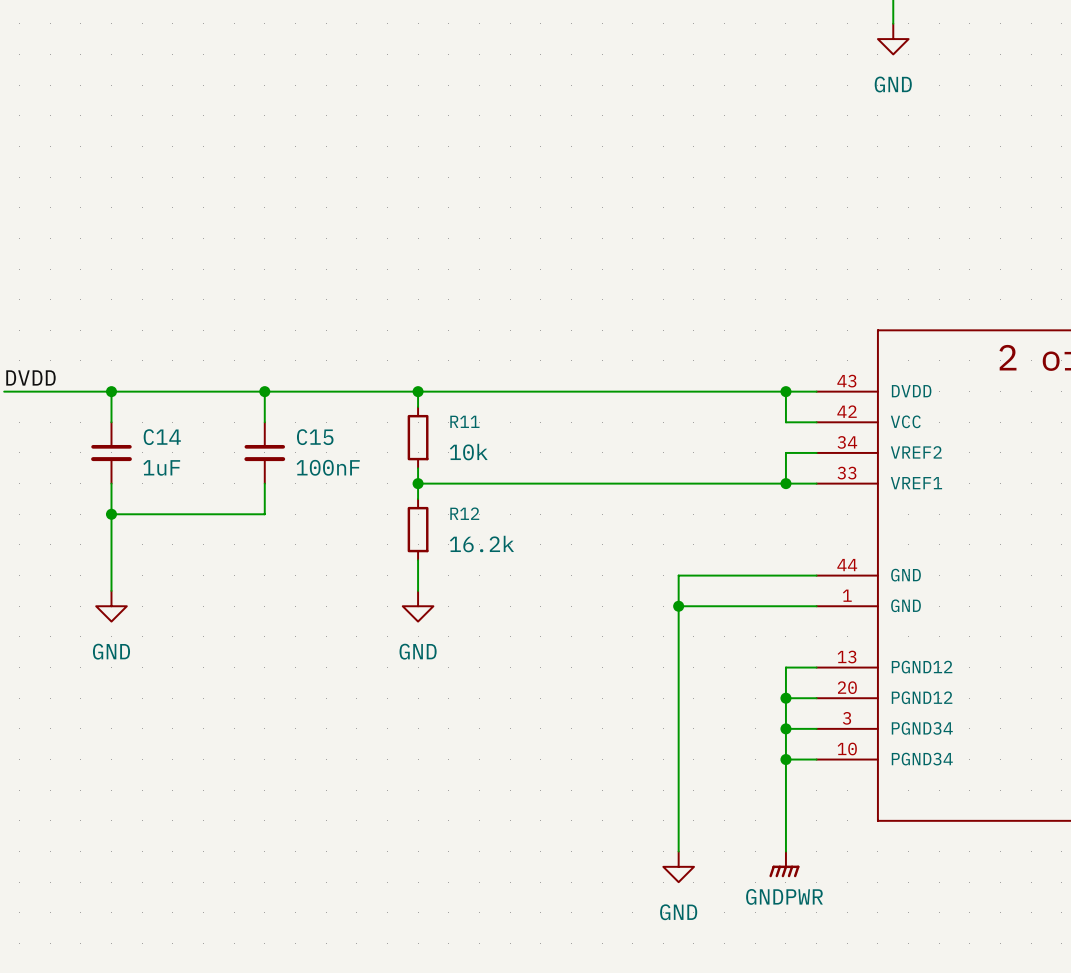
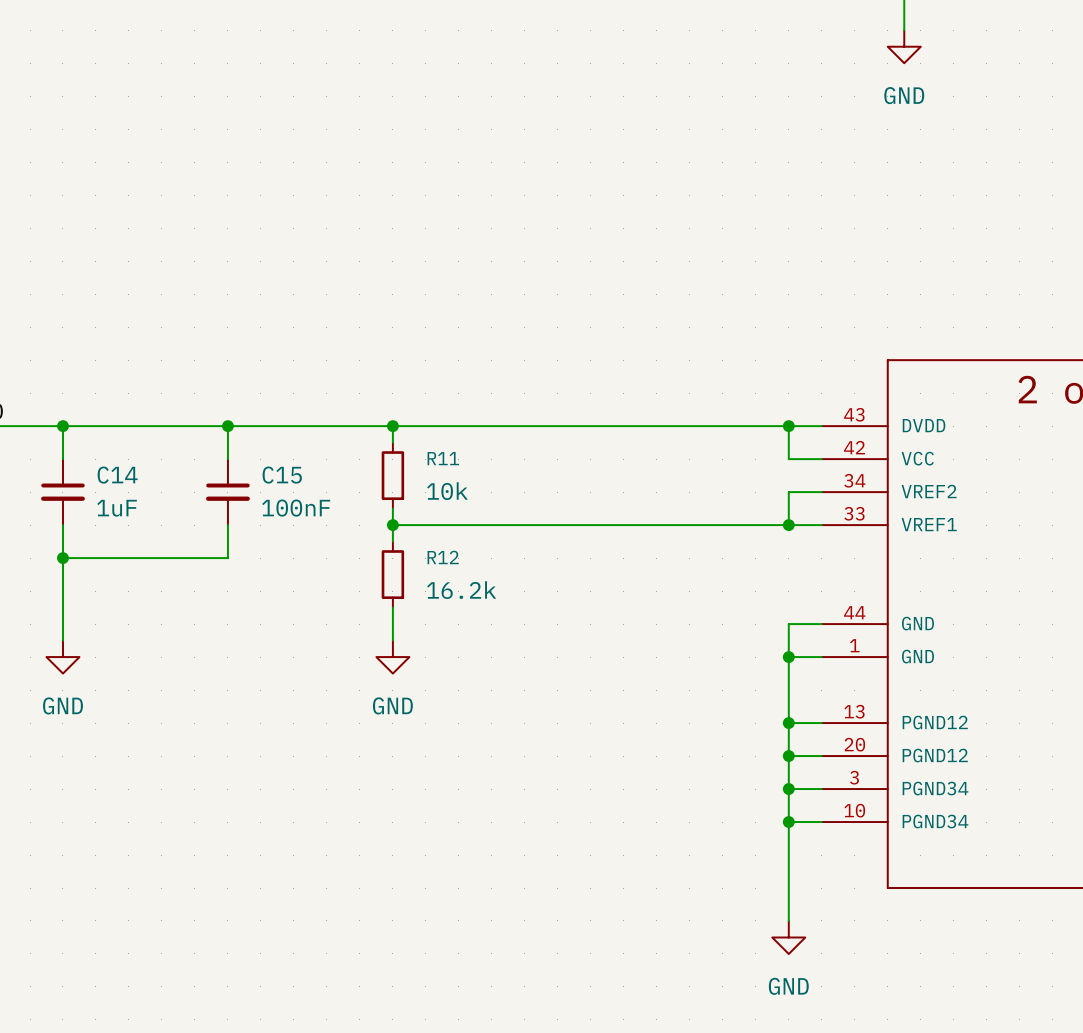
wire: (785, 575) (678, 575) (678, 851) -> (788, 624) (788, 723)
wire: (678, 606) (785, 606) -> none
junction: (678, 606) -> none
junction: none -> (788, 657)
junction: none -> (788, 723)
power symbol: GNDPWR (784, 864) -> GND (788, 937)
power symbol: GND (678, 866) -> none

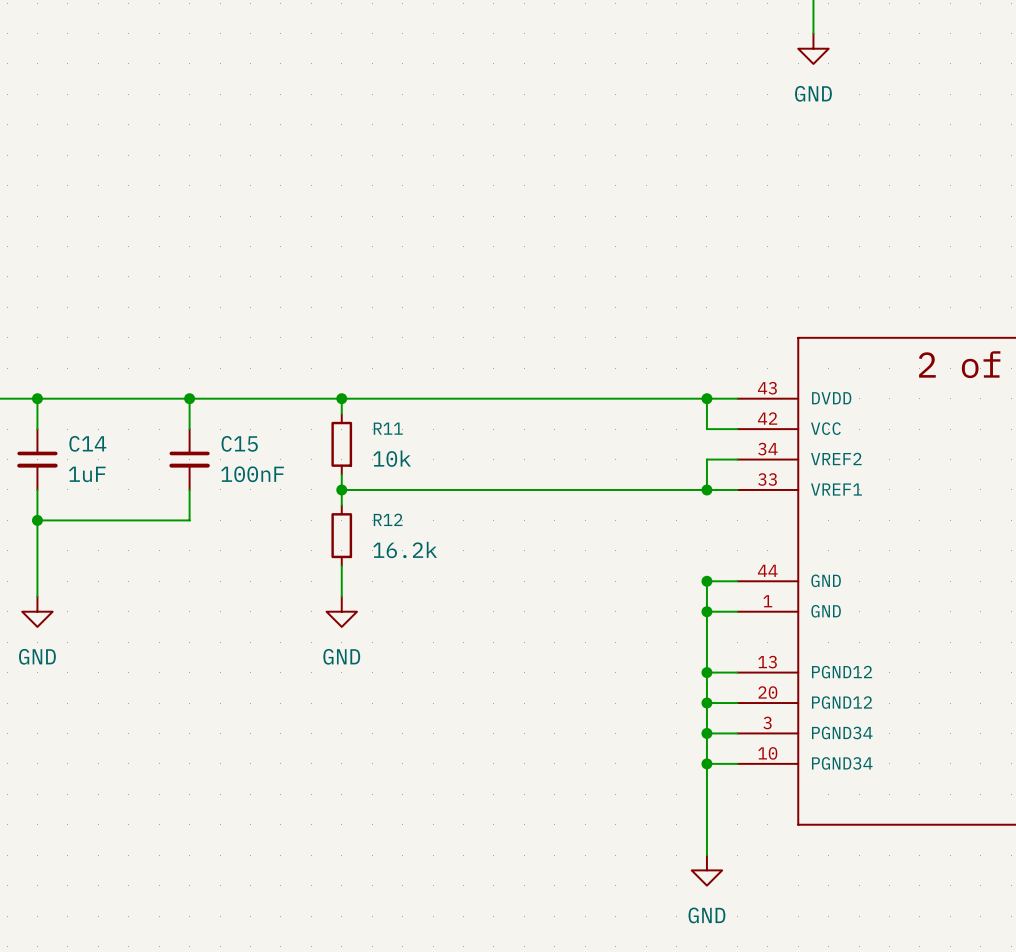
junction: none -> (706, 581)

